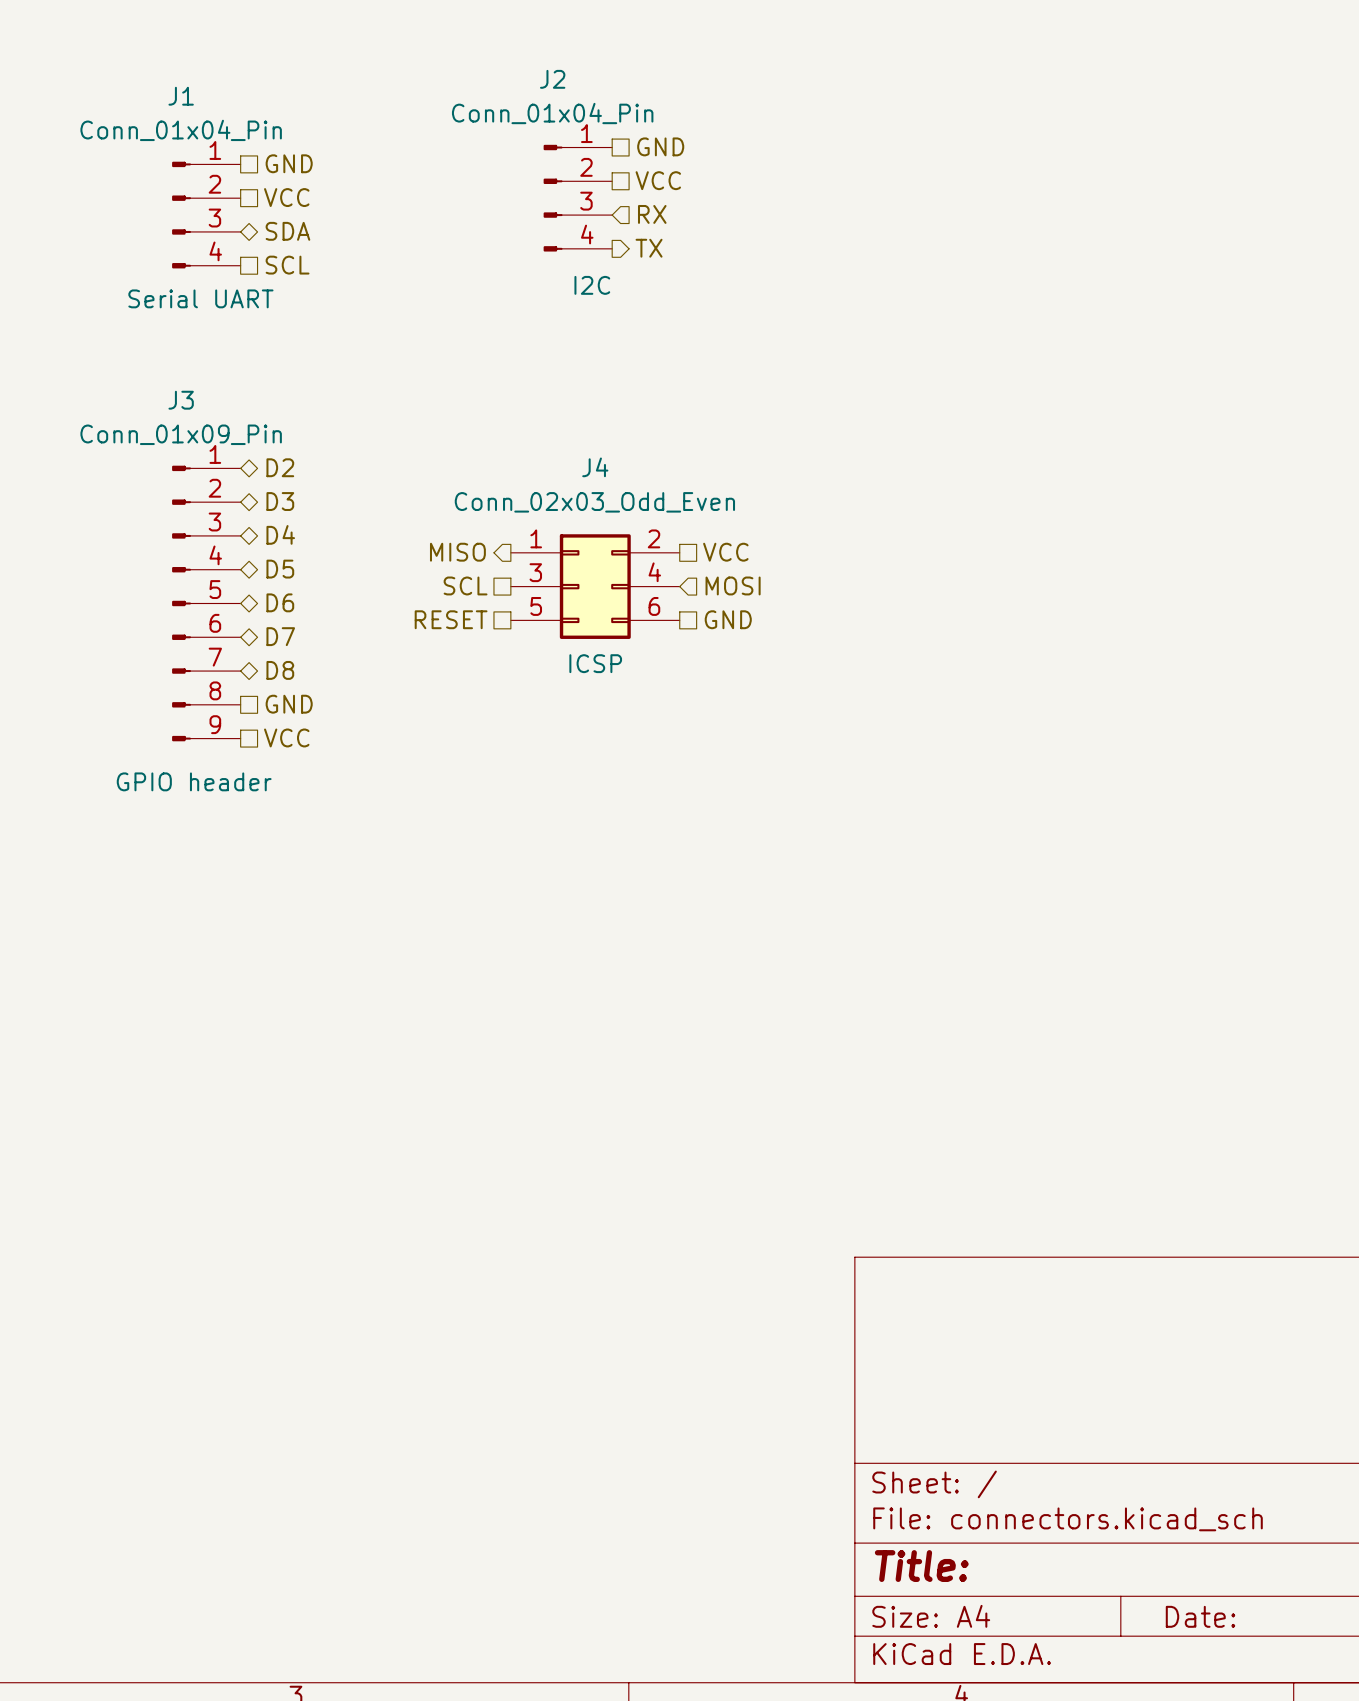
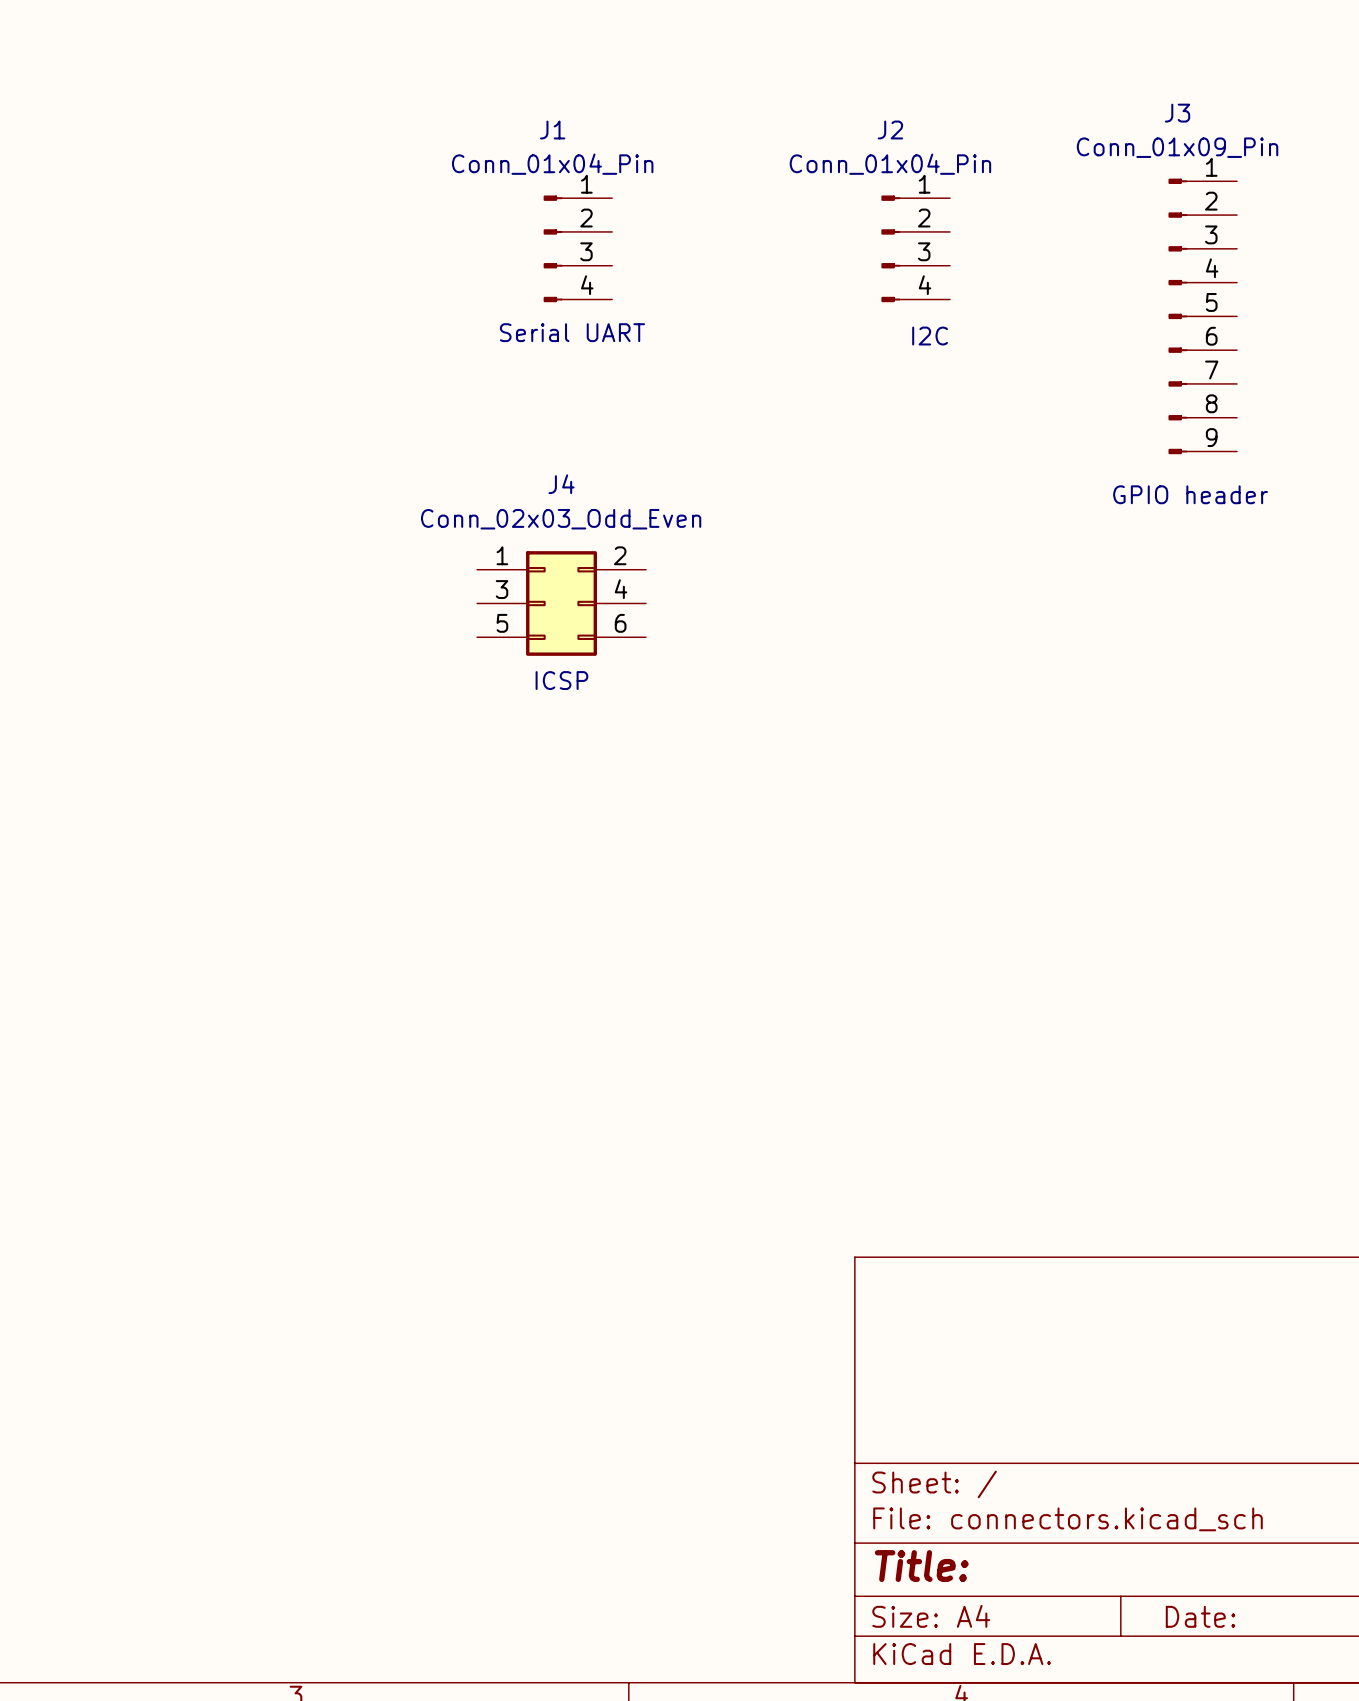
hierarchical label: GND (660, 146) -> none
hierarchical label: GND (289, 163) -> none
hierarchical label: VCC (658, 180) -> none
hierarchical label: VCC (286, 197) -> none
J2 position: (577, 198) -> (915, 248)
hierarchical label: RX (652, 214) -> none
J1 position: (206, 215) -> (577, 248)
hierarchical label: SDA (287, 231) -> none
hierarchical label: TX (649, 248) -> none
hierarchical label: SCL (287, 265) -> none
hierarchical label: D2 (280, 467) -> none
hierarchical label: D3 (280, 501) -> none
hierarchical label: D4 (280, 534) -> none
hierarchical label: MISO (457, 552) -> none
hierarchical label: VCC (725, 552) -> none
hierarchical label: D5 (280, 569) -> none
hierarchical label: SCL (465, 585) -> none
hierarchical label: MOSI (733, 585) -> none
J4 position: (595, 586) -> (561, 603)
hierarchical label: D6 (280, 602) -> none
J3 position: (206, 603) -> (1202, 316)
hierarchical label: RESET (451, 619) -> none
hierarchical label: GND (728, 619) -> none
hierarchical label: D7 (280, 636) -> none
hierarchical label: D8 (280, 670) -> none
hierarchical label: GND (289, 704) -> none
hierarchical label: VCC (286, 737) -> none

